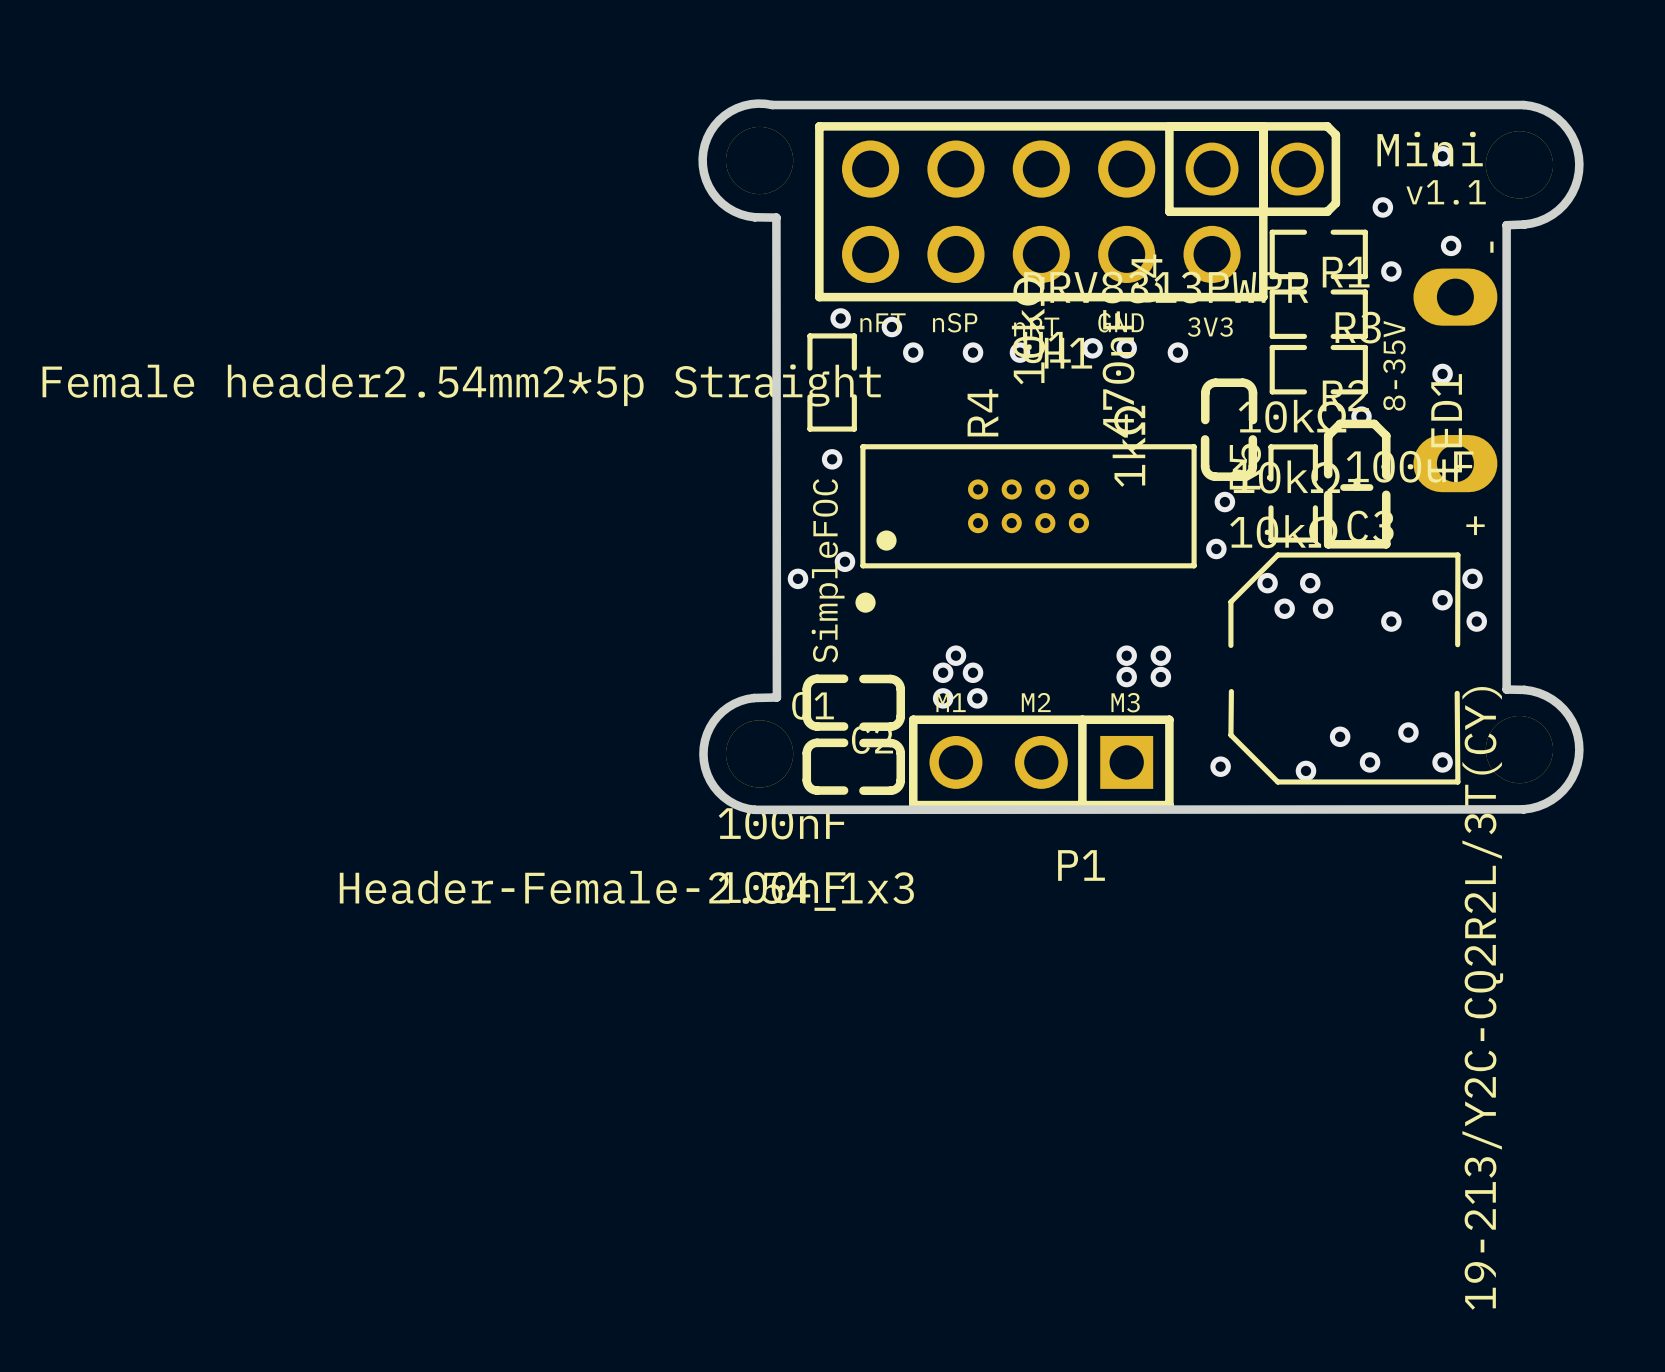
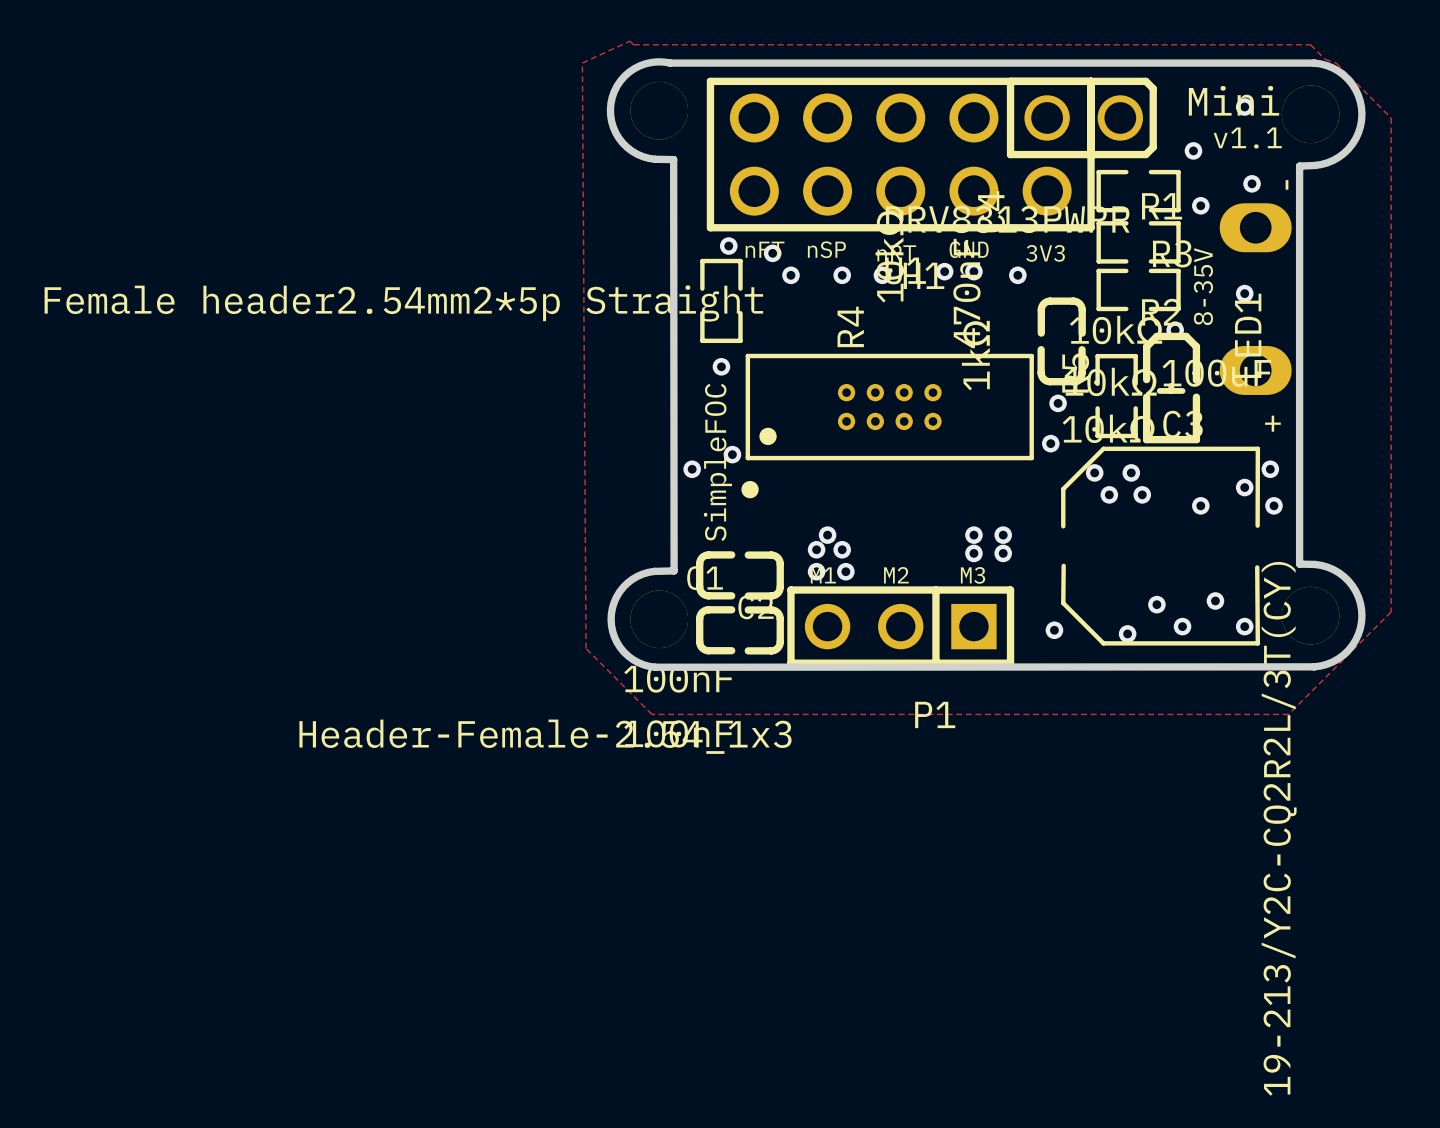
zone outline: none -> (629, 41) (582, 63) (586, 648) (651, 714) (1288, 714) (1391, 611) (1391, 117) (1336, 63) (1325, 59) (1310, 44) (633, 44) (629, 41)

